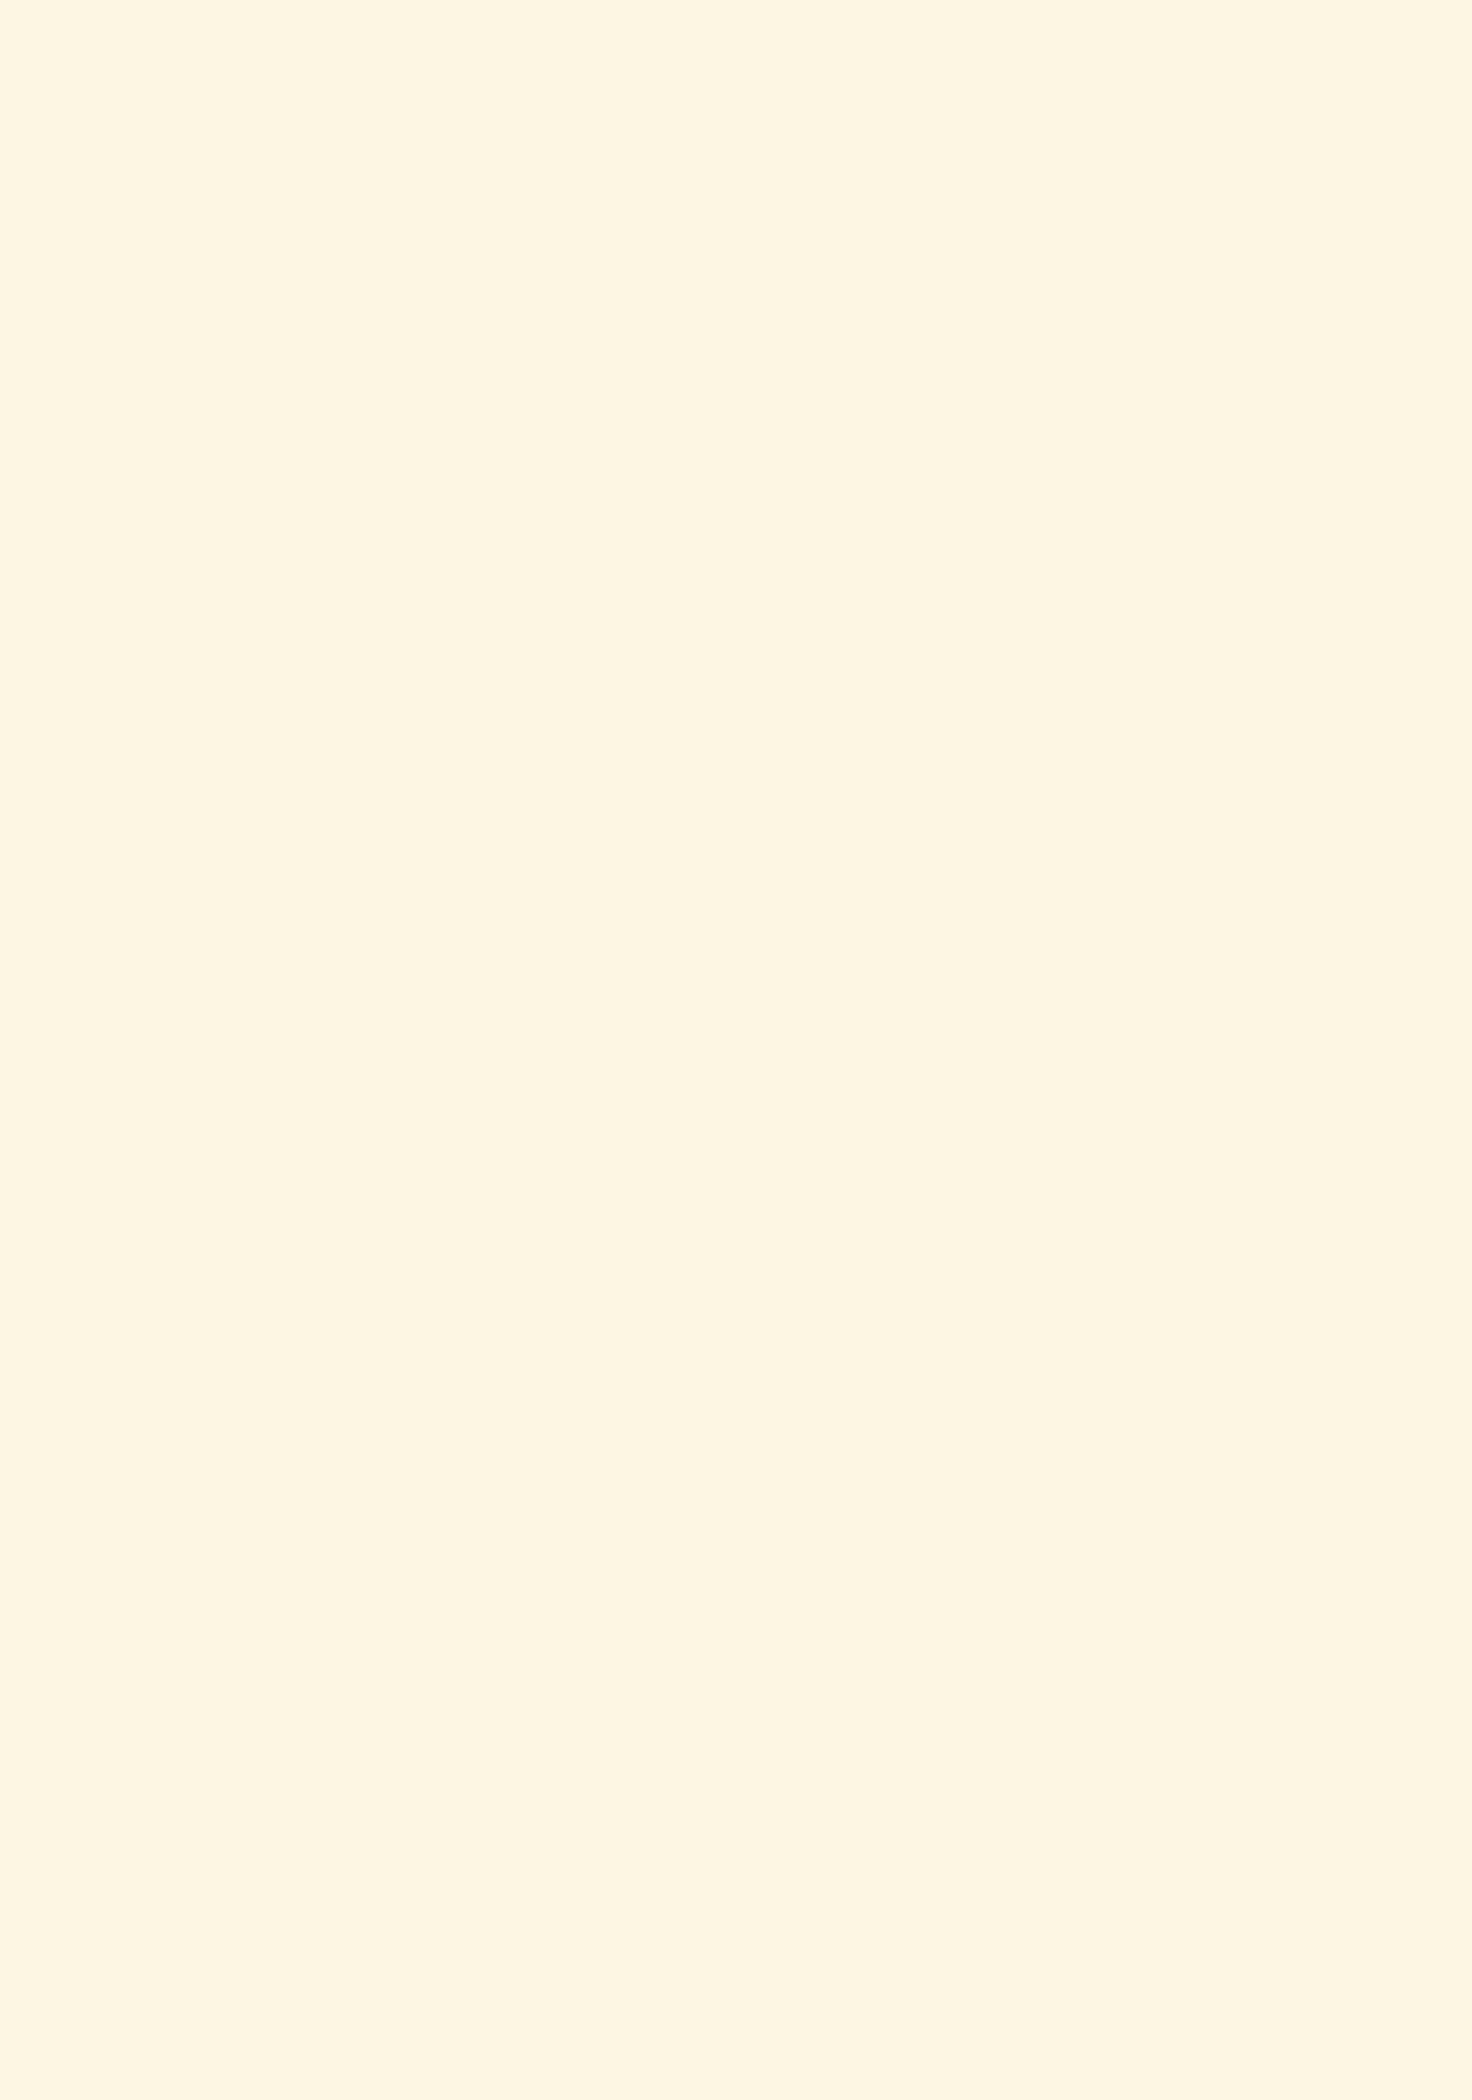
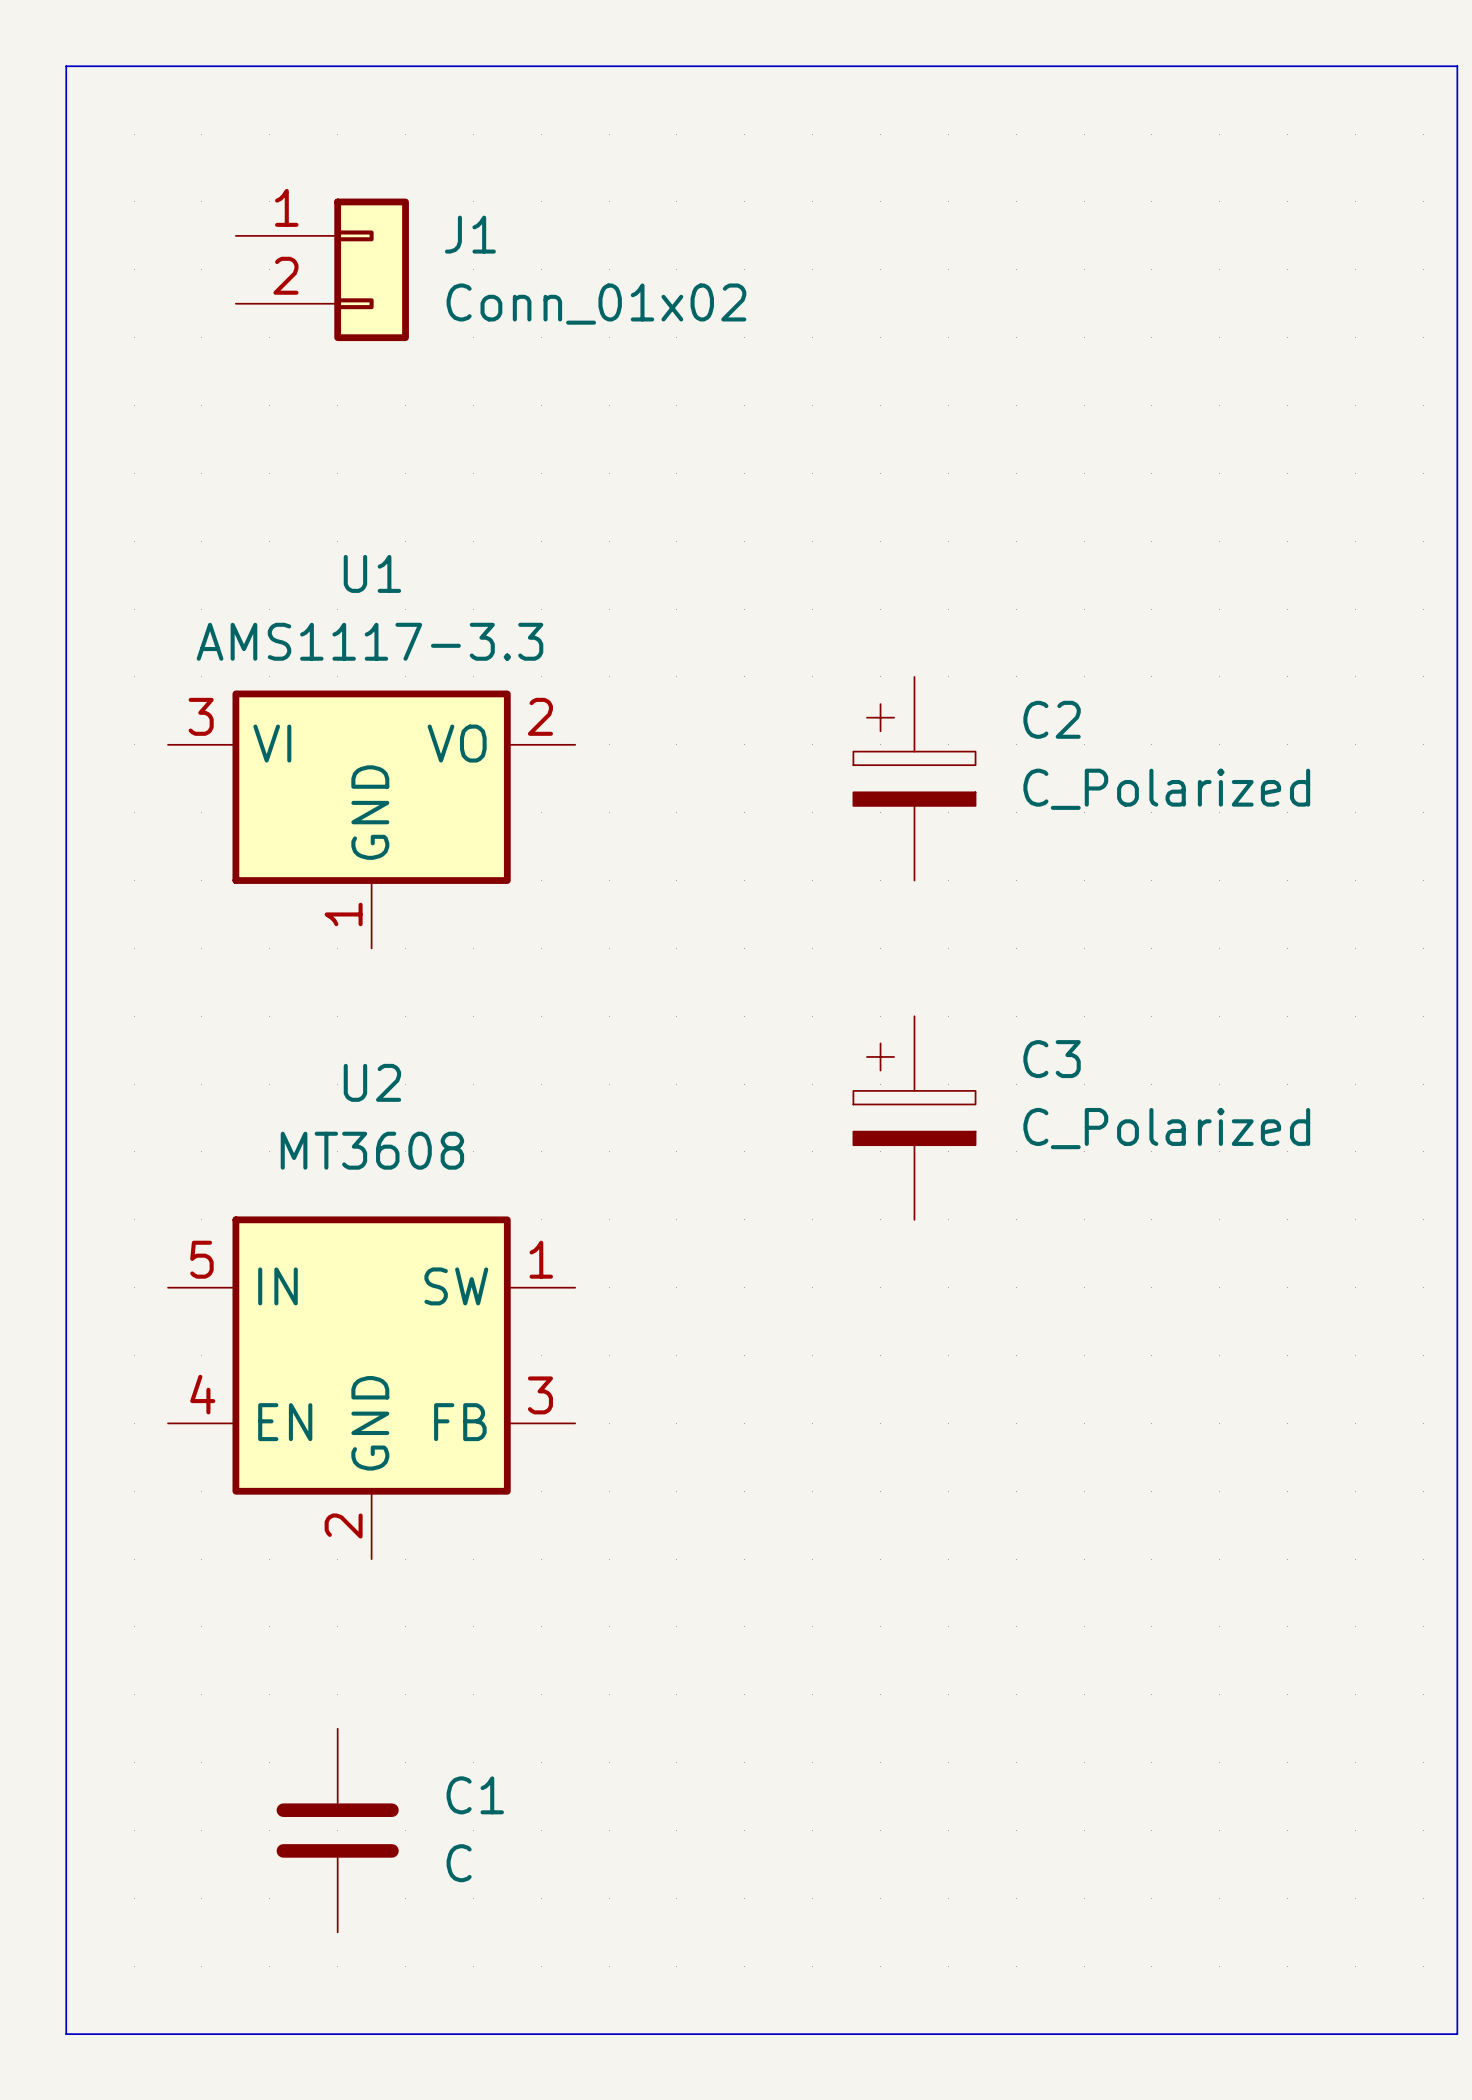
line: none -> (66, 66) (1457, 66) (1457, 2034) (66, 2034) (66, 66)
J1: none -> Conn_01x02 (322, 269)
C2: none -> C_Polarized (914, 778)
U1: none -> AMS1117-3.3 (371, 819)
C3: none -> C_Polarized (914, 1118)
U2: none -> MT3608 (371, 1387)
C1: none -> C (337, 1830)

